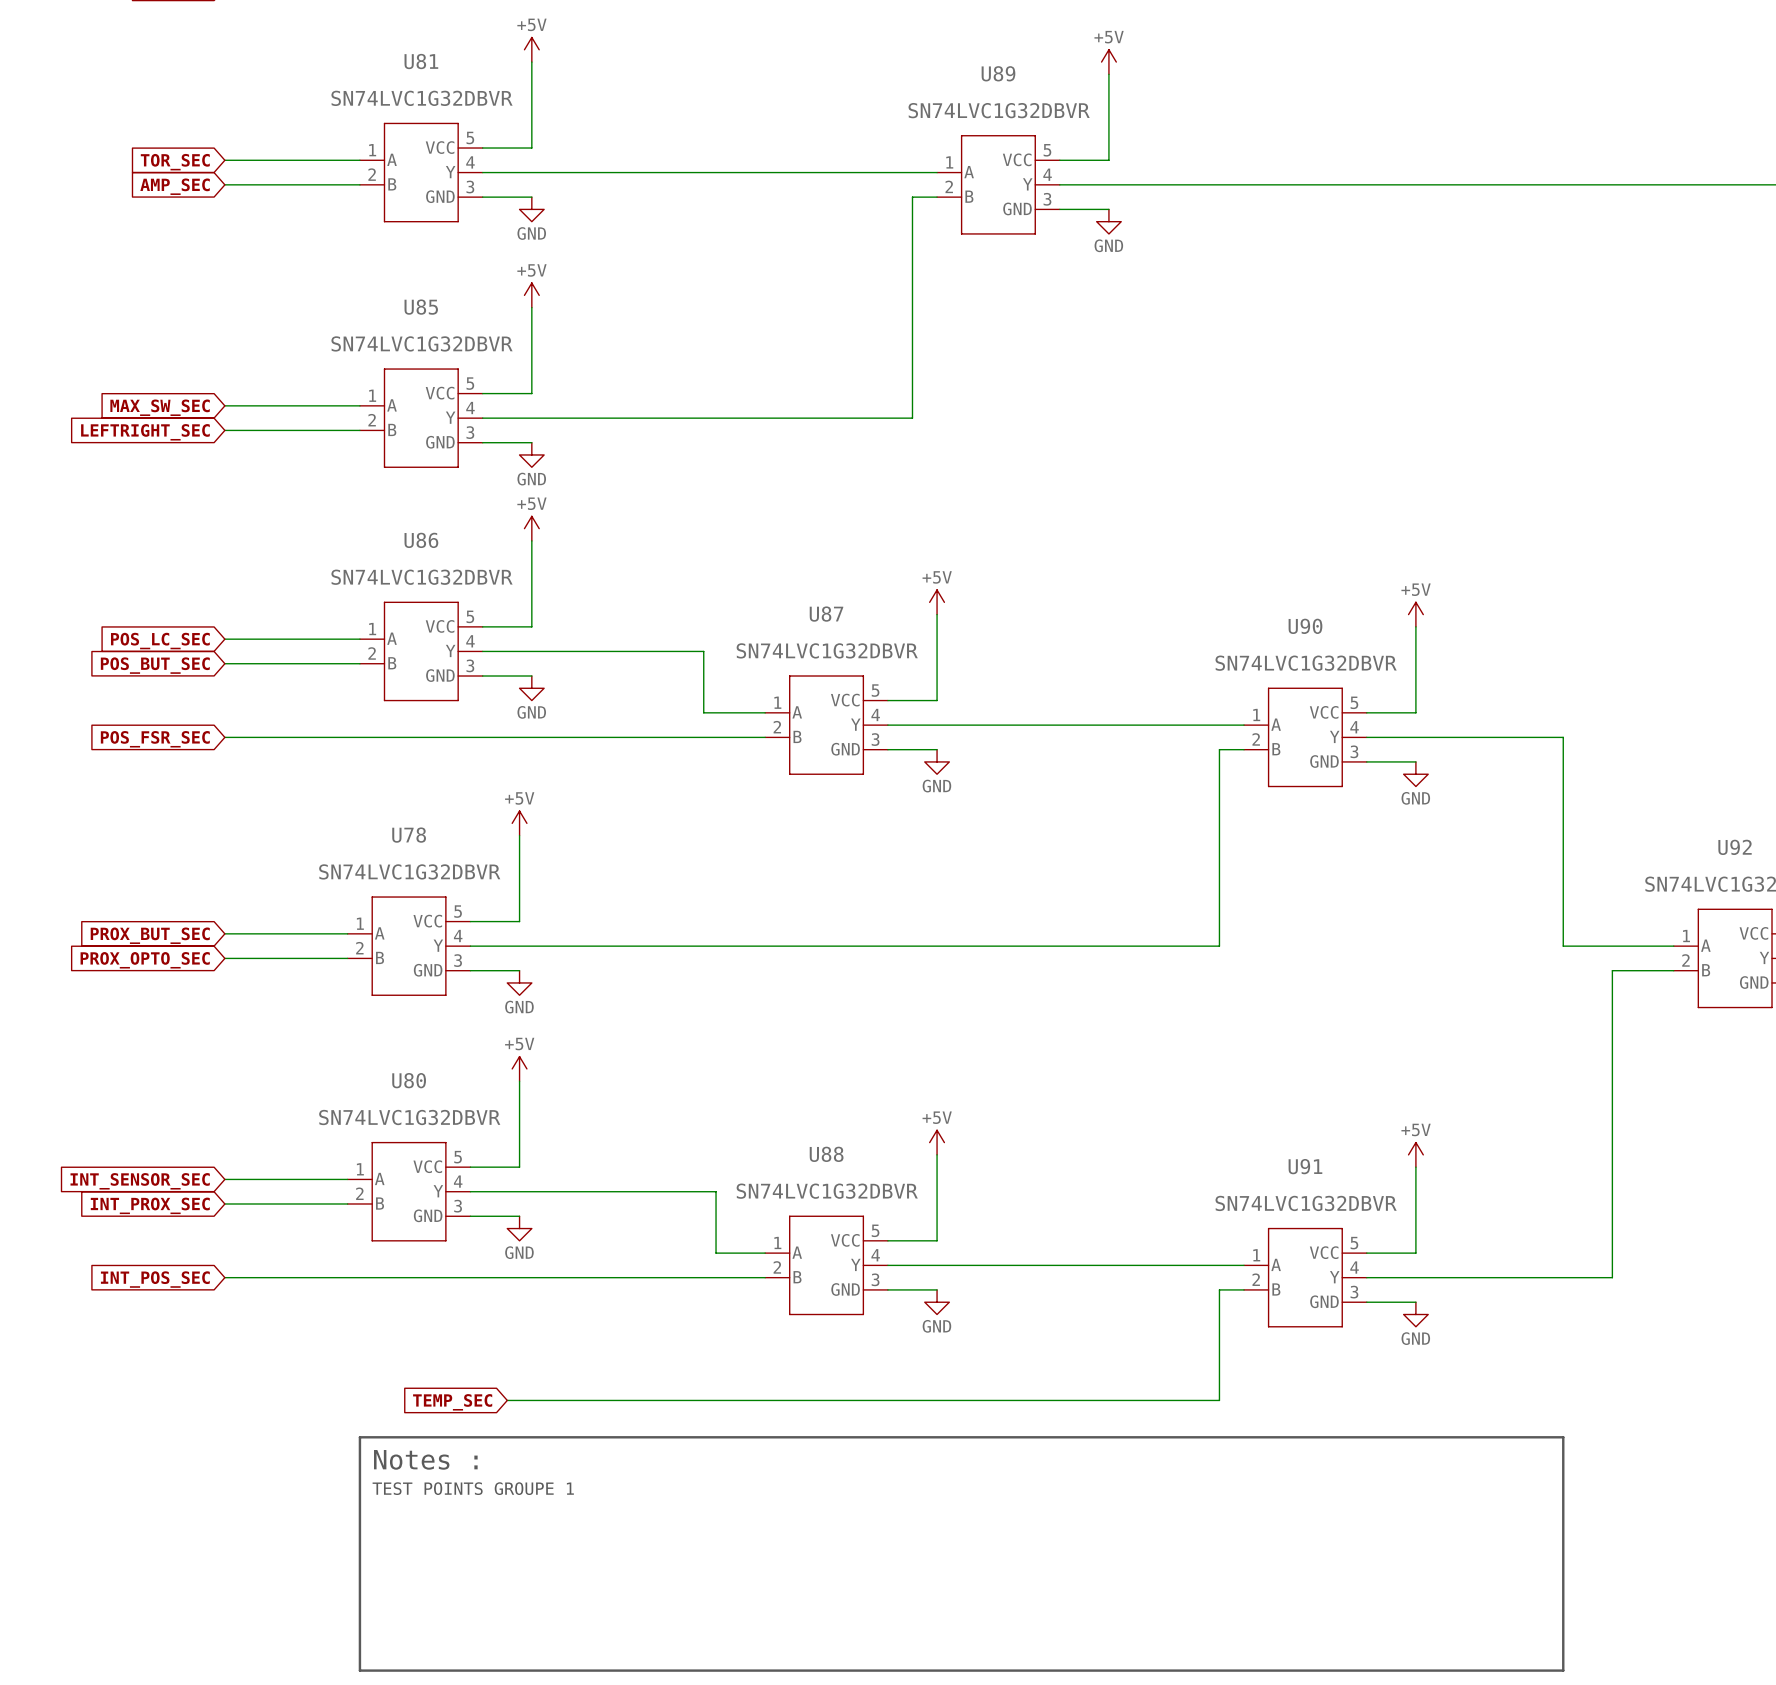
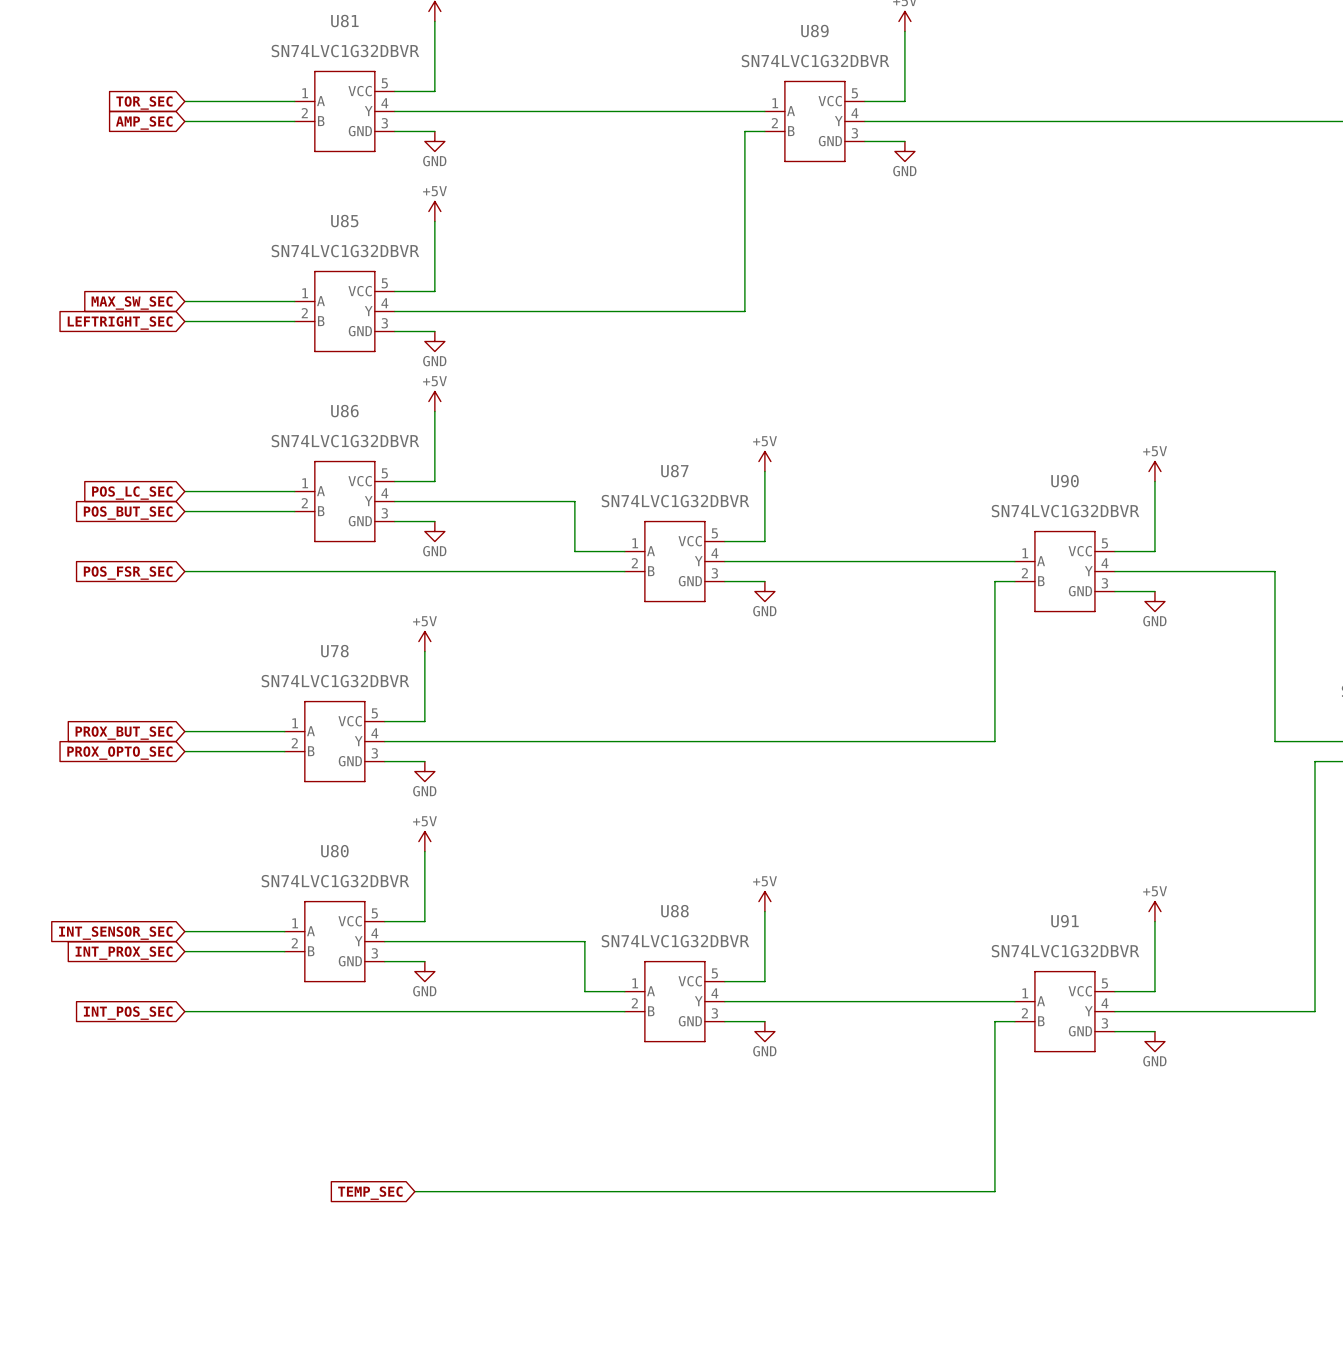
wire: (507, 1400) (1219, 1400) -> (414, 1191) (994, 1191) (994, 1111)
global label position: TEMP_SEC (452, 1402) -> TEMP_SEC (370, 1193)
line: (359, 1437) (1563, 1437) (1563, 1670) (359, 1670) (359, 1437) -> none
text: Notes : (425, 1459) -> none
text: TEST POINTS GROUPE 1 (473, 1488) -> none

